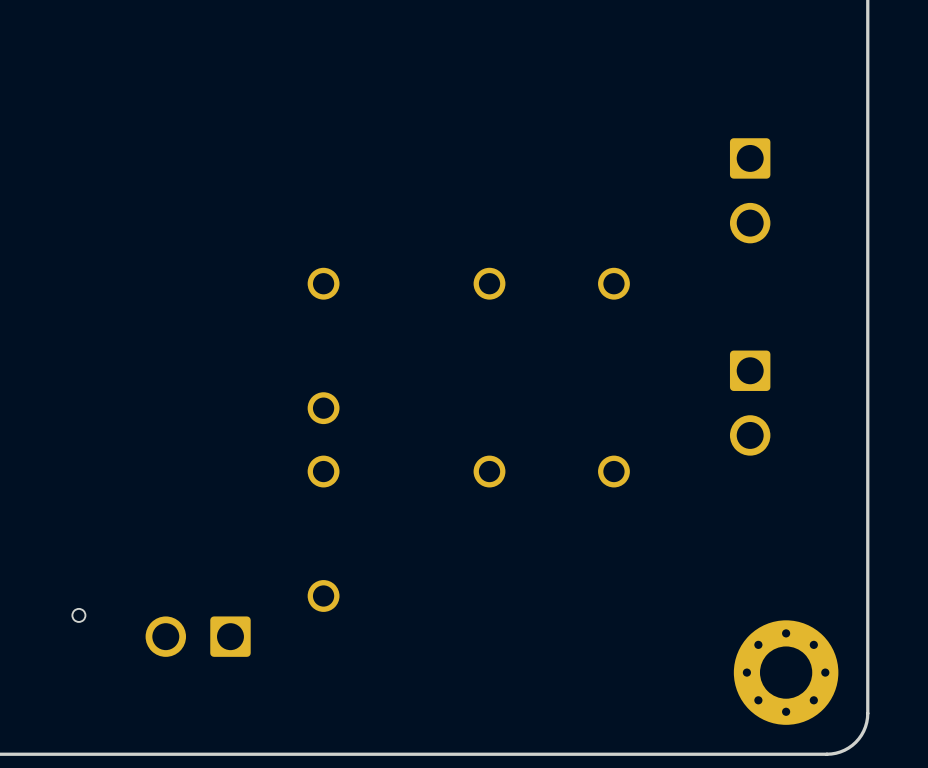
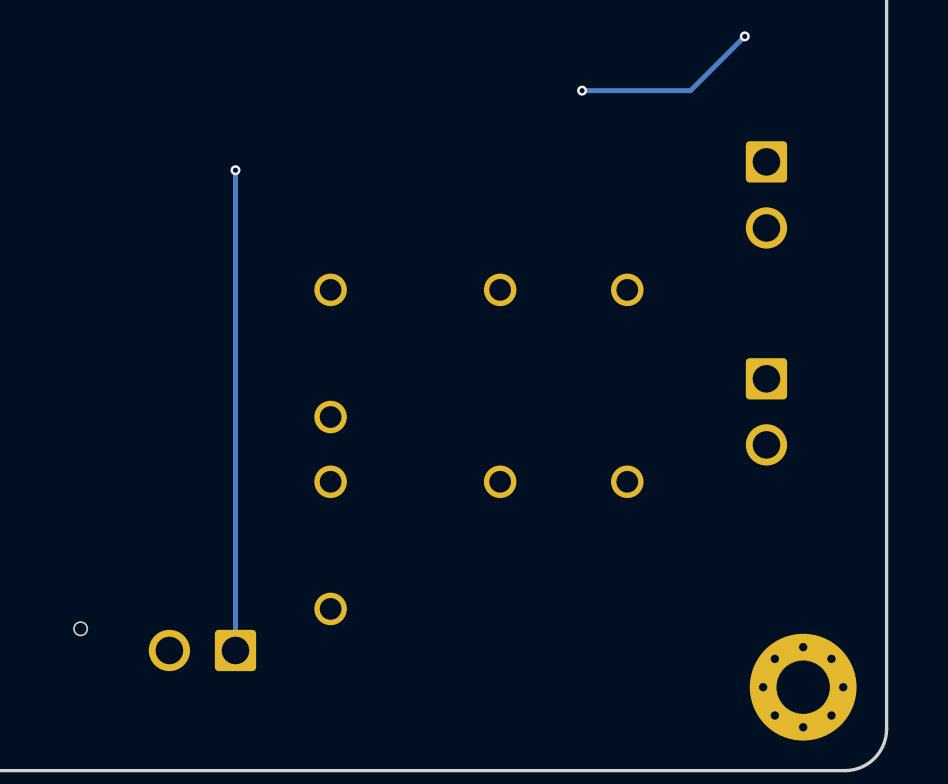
track: none -> (744, 36) (690, 90) (582, 90)
via: none -> (744, 36)
via: none -> (582, 90)
track: none -> (235, 170) (235, 650)
via: none -> (235, 170)

